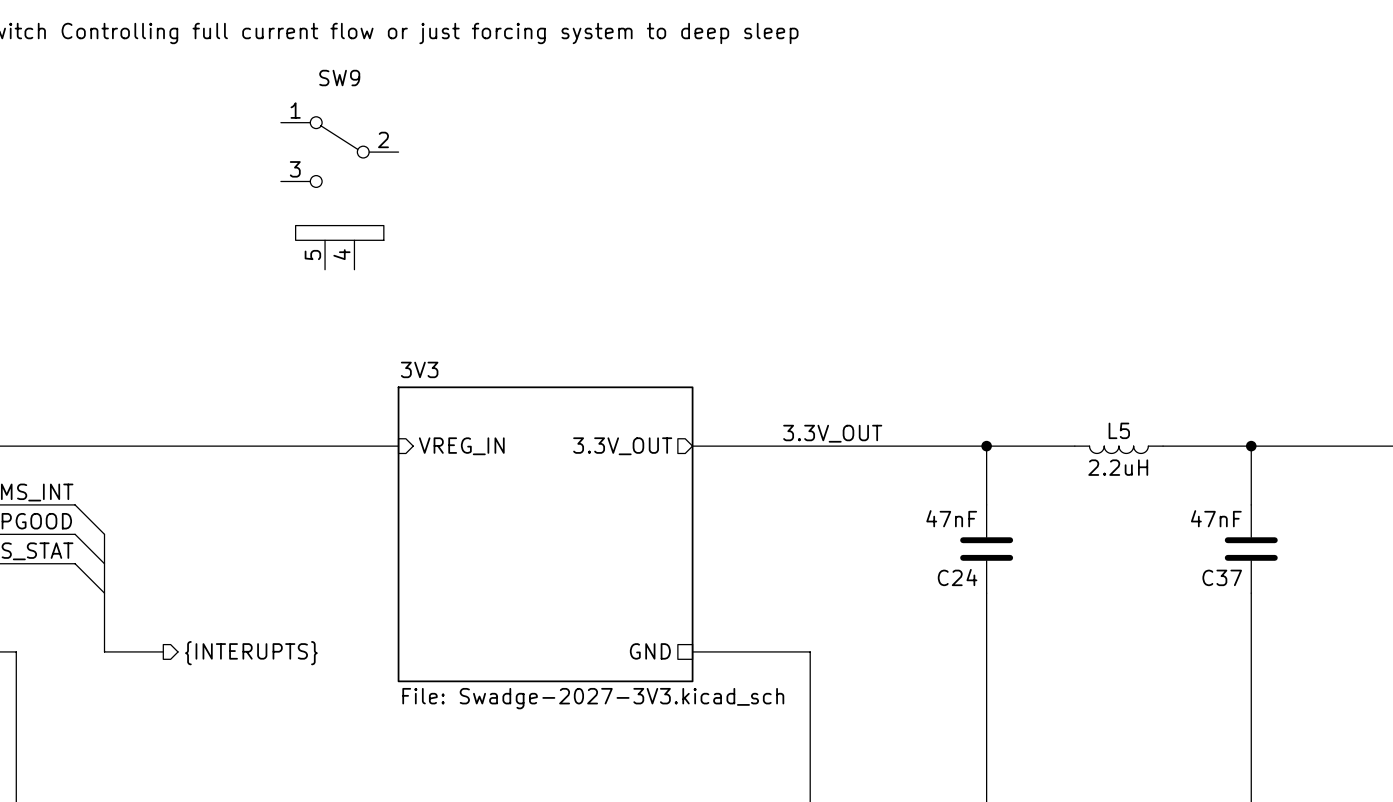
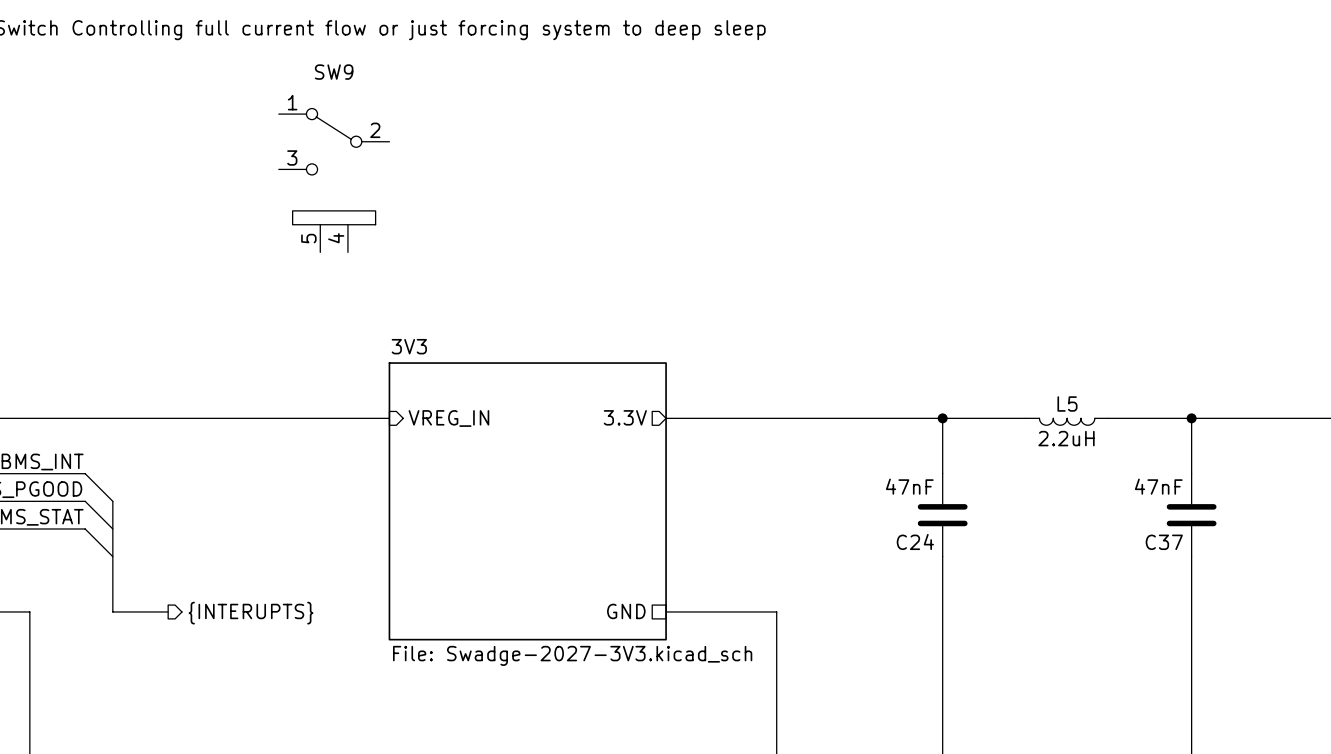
label: 3.3V_OUT (832, 433) -> none
sheet pin: 3.3V_OUT (622, 446) -> 3.3V (625, 417)

